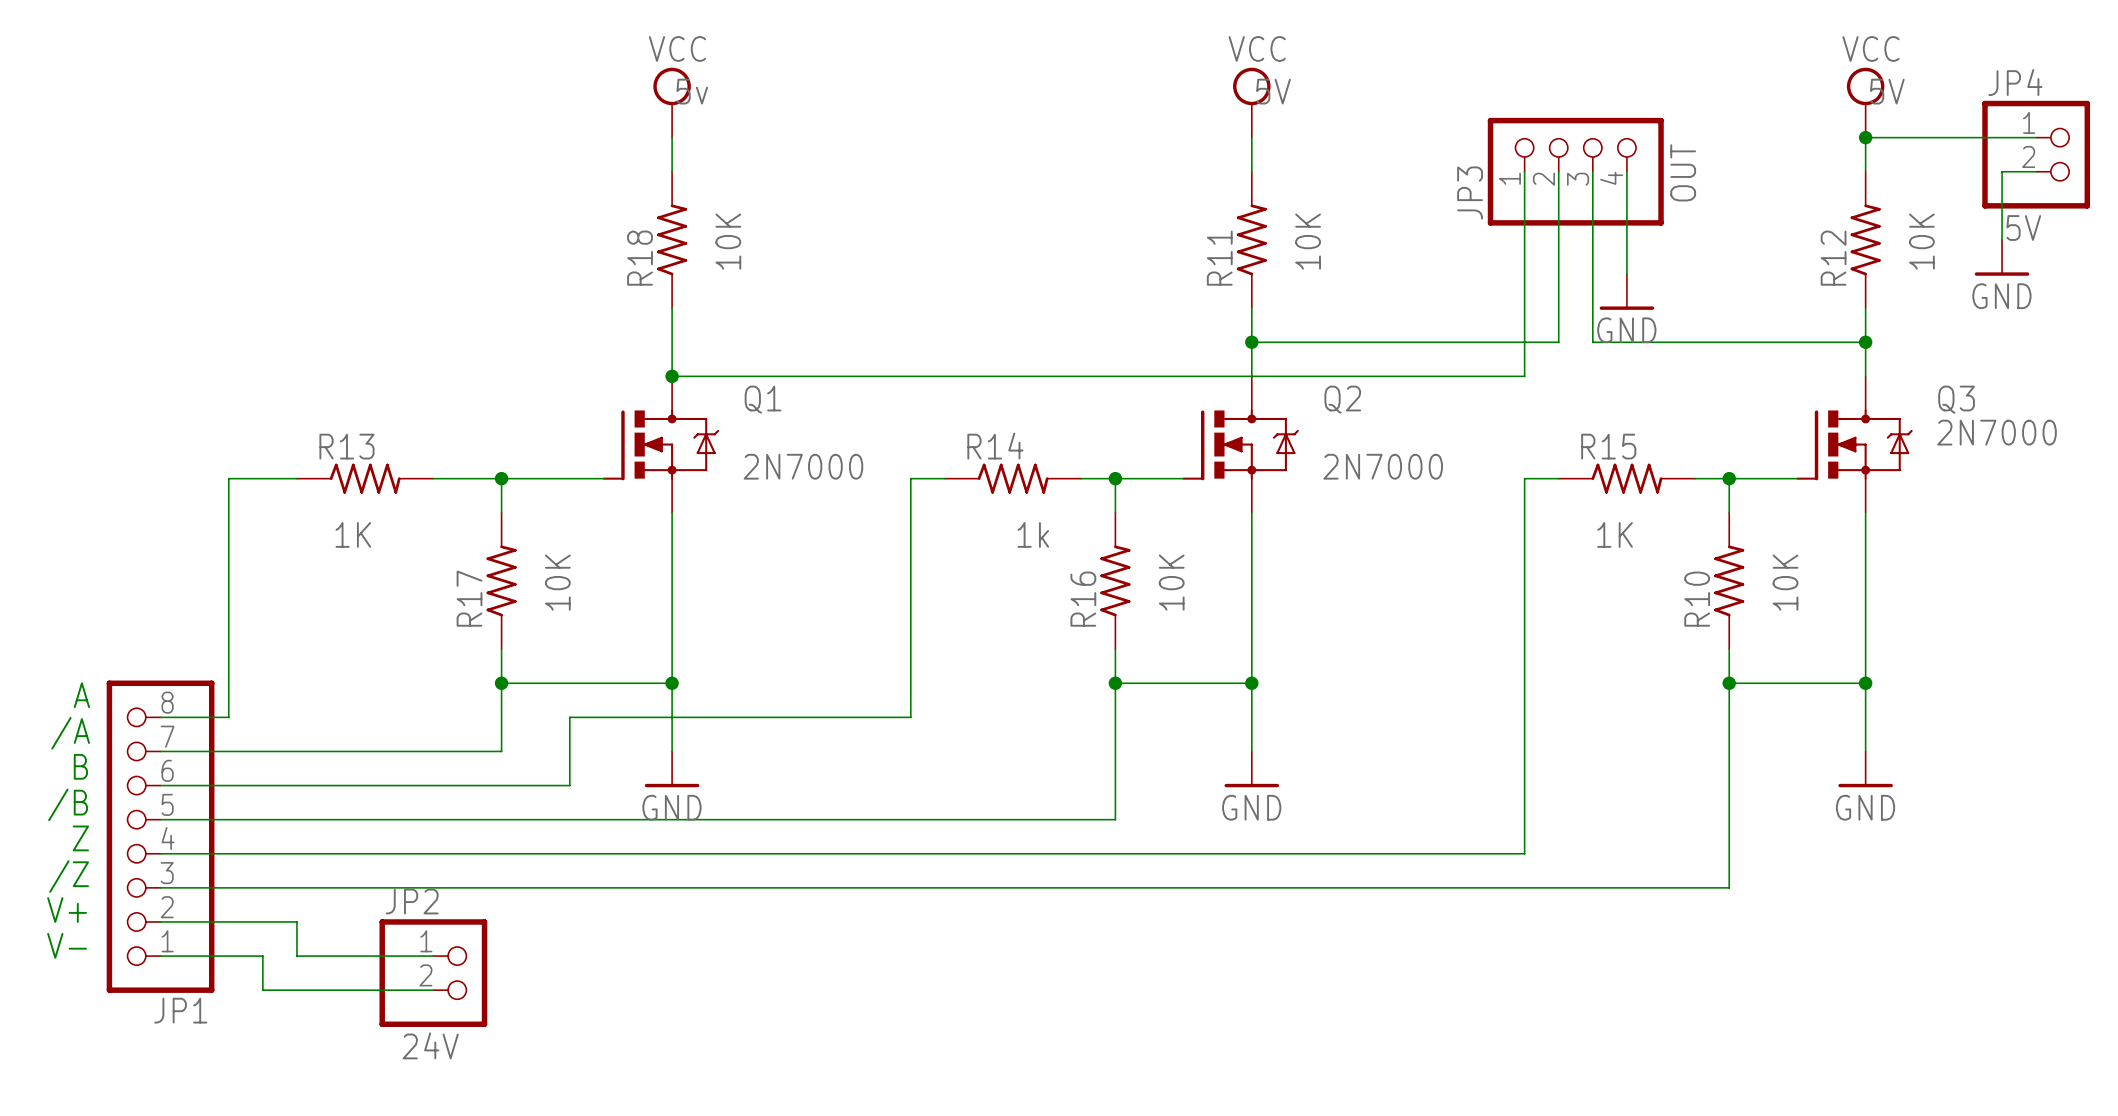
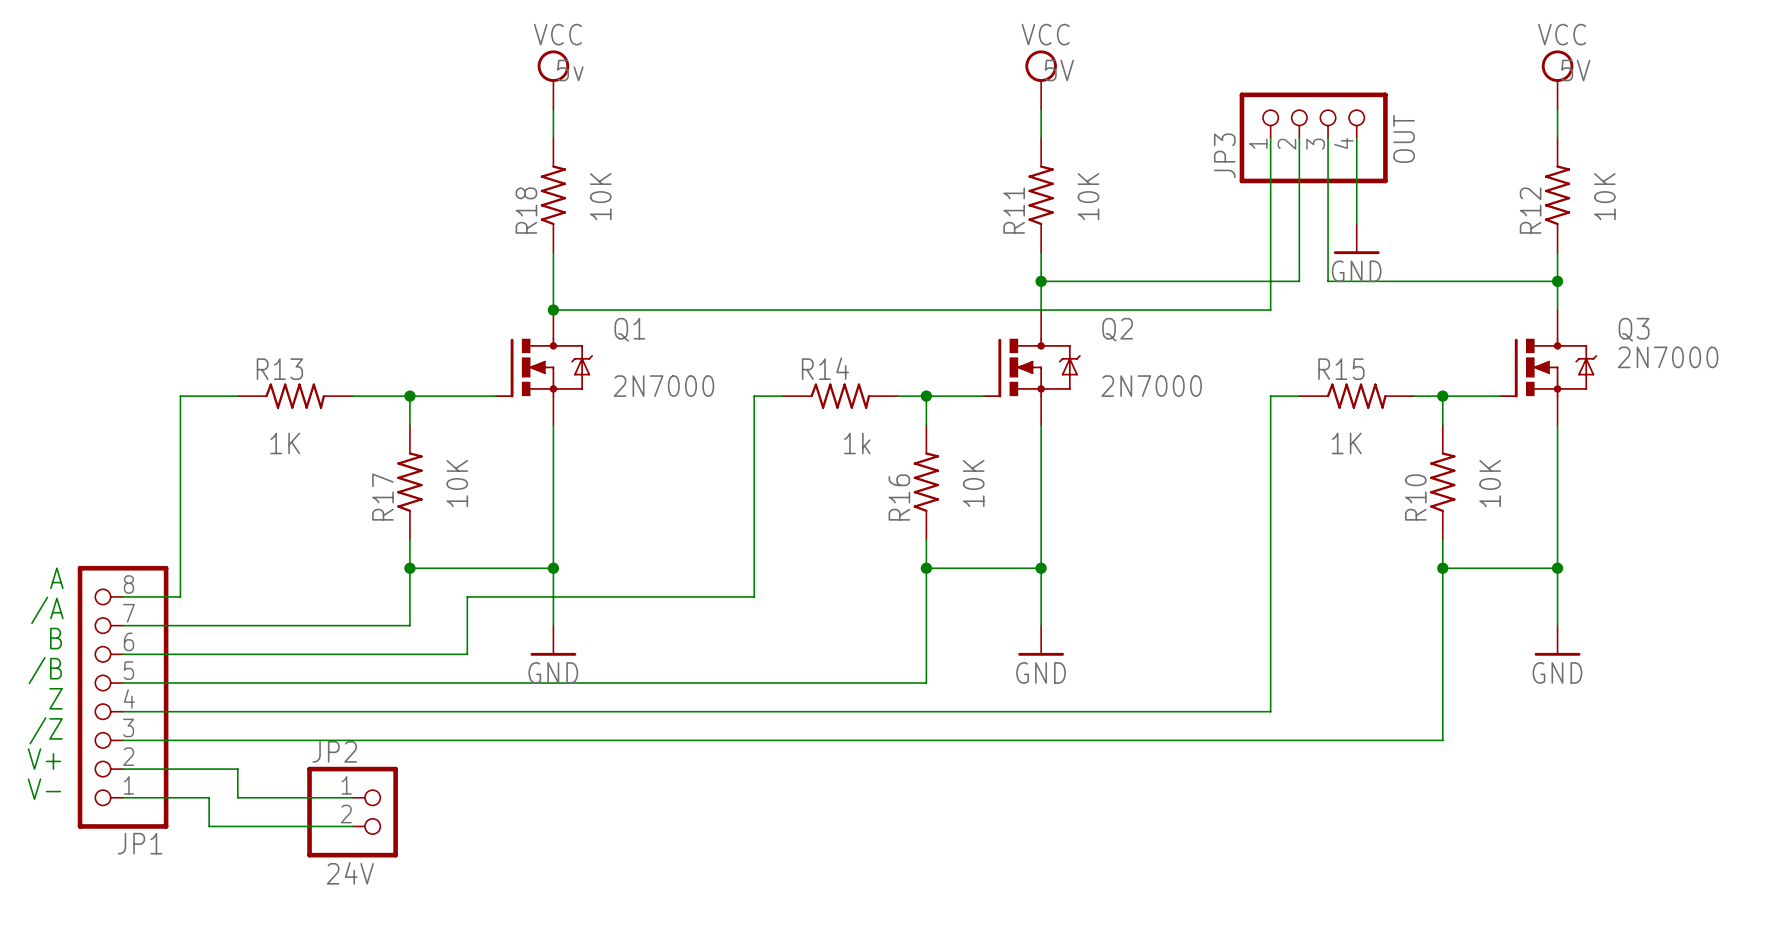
wire: (1865, 137) (2036, 137) -> none
junction: (1865, 137) -> none
JP4: (2036, 154) -> none
wire: (2036, 171) (2002, 171) (2002, 239) -> none
power symbol: GND (2002, 257) -> none

